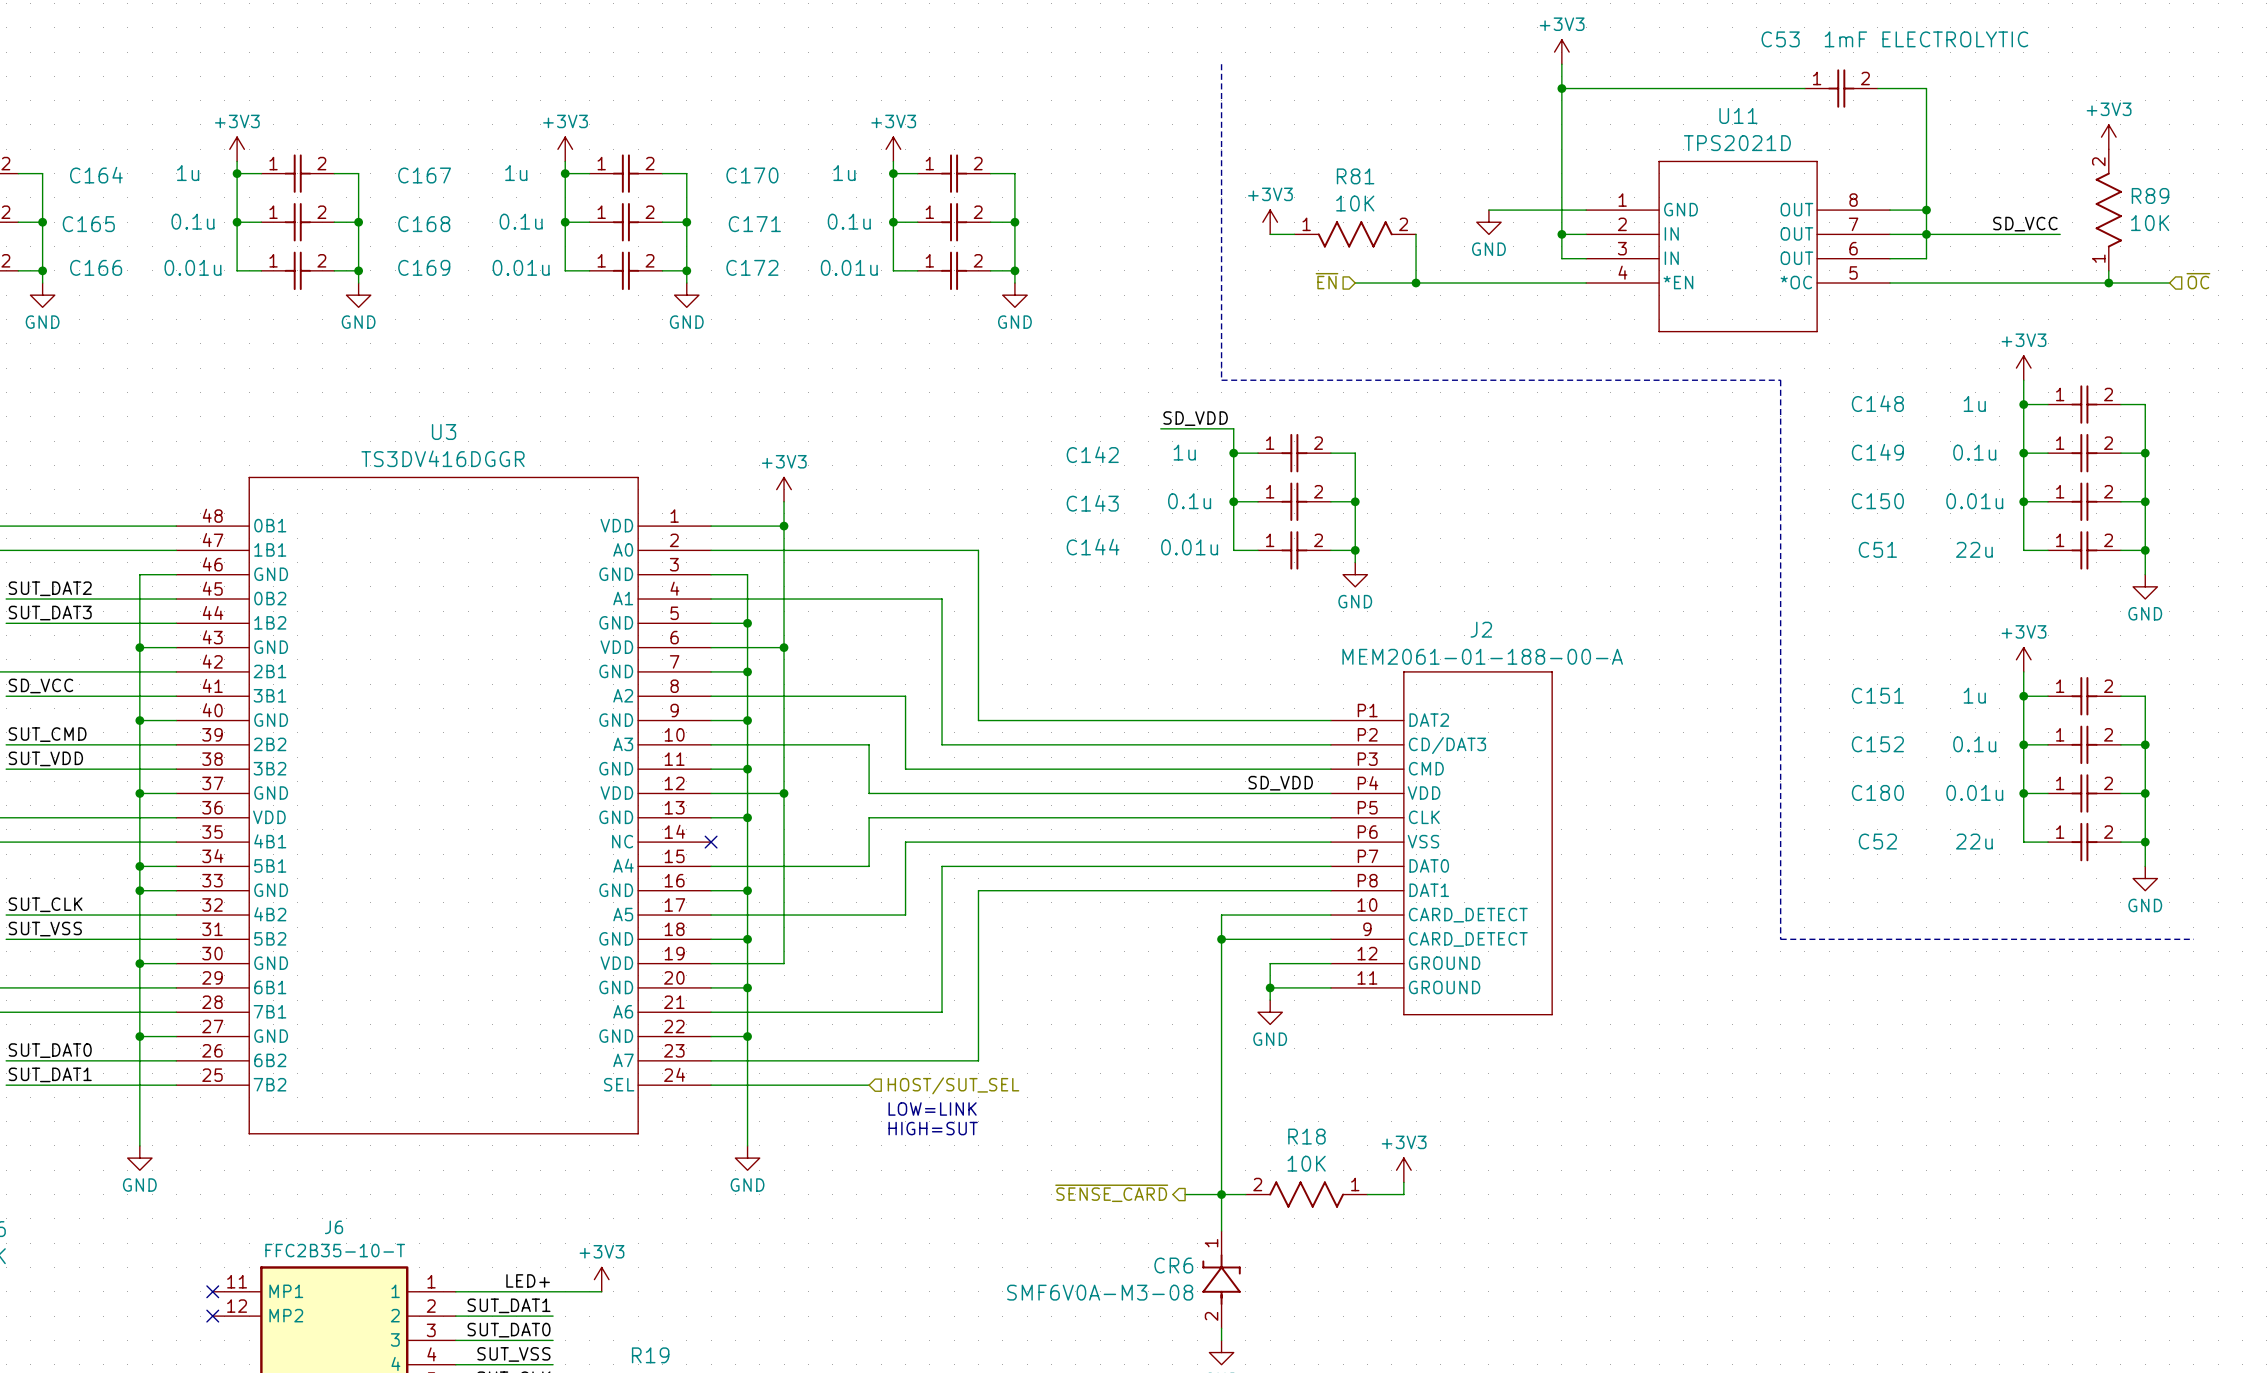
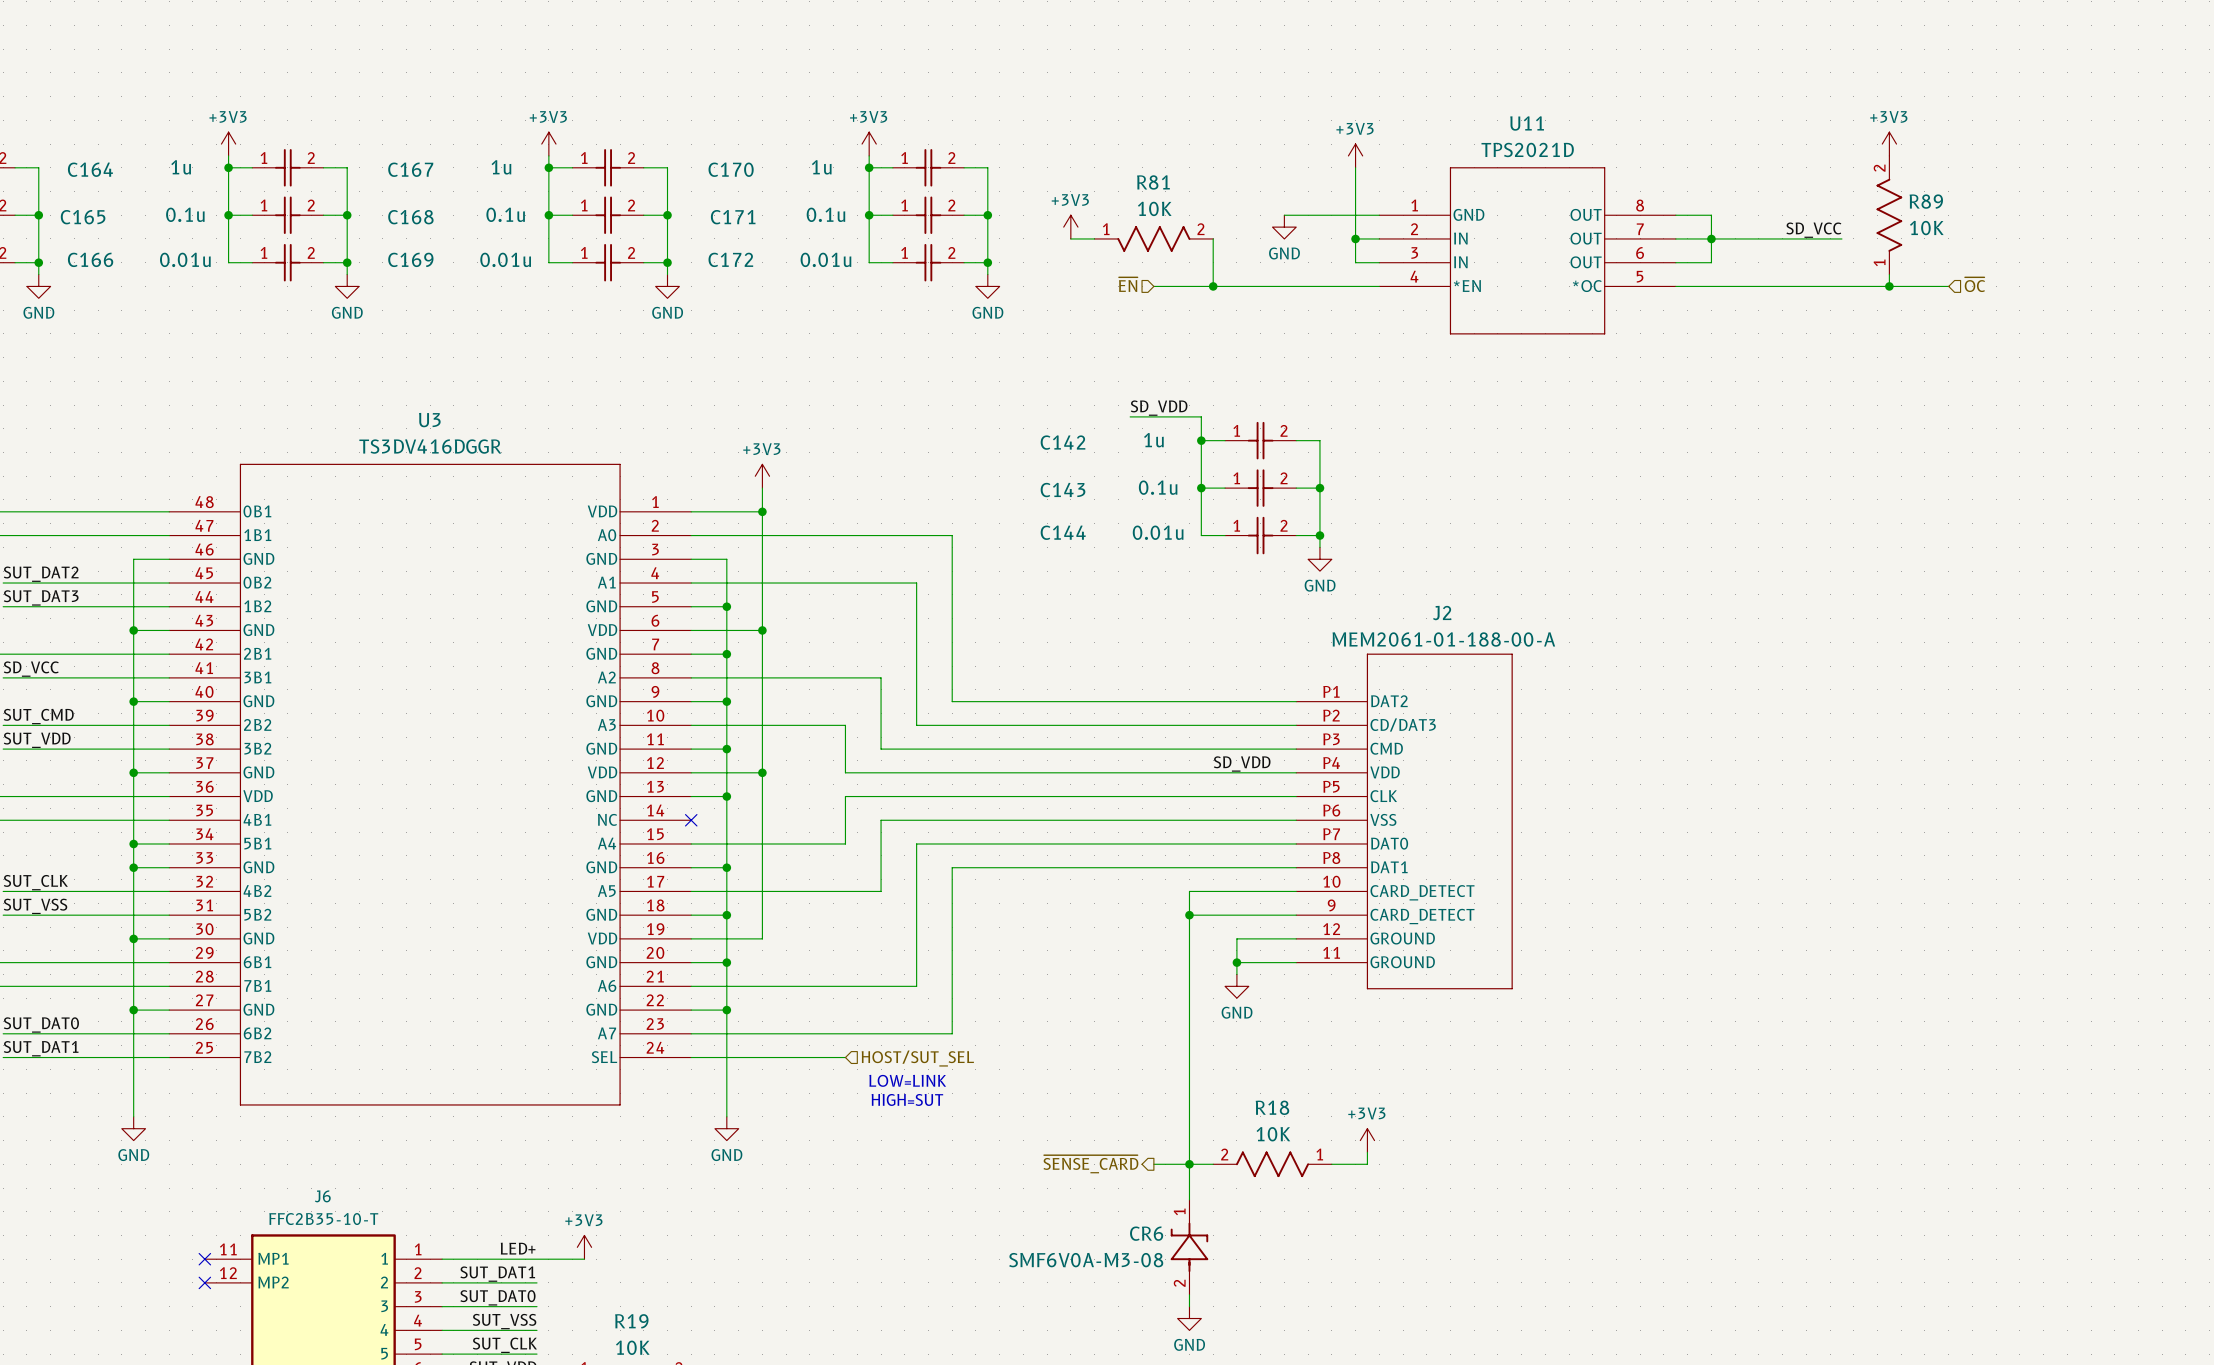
power symbol: +3V3 (1561, 52) -> none
line: (1221, 64) (1221, 380) (1780, 380) (1780, 939) (2193, 939) -> none
wire: (1561, 64) (1561, 258) (1586, 258) -> none
wire: (1561, 88) (1804, 88) -> none
junction: (1561, 88) -> none
C53: 1mF ELECTROLYTIC (1841, 88) -> none
wire: (1877, 88) (1926, 88) (1926, 258) (1890, 258) -> none
power symbol: +3V3 (2108, 137) -> none
power symbol: none -> +3V3 (1889, 144)
power symbol: none -> +3V3 (1355, 155)
wire: none -> (1355, 167) (1355, 262) (1379, 262)
wire: (1488, 210) (1586, 210) -> (1284, 215) (1379, 215)
wire: (1890, 210) (1926, 210) -> none
junction: (1926, 210) -> none
R89 position: (2108, 210) -> (1889, 215)
power symbol: +3V3 (1270, 222) -> none
power symbol position: GND (1488, 222) -> GND (1284, 227)
wire: none -> (1675, 215) (1711, 215) (1711, 262) (1675, 262)
label position: SD_VCC (2025, 224) -> SD_VCC (1813, 230)
power symbol: none -> +3V3 (1070, 227)
wire: (1270, 234) (1294, 234) -> (1070, 238) (1094, 238)
R81 position: (1355, 234) -> (1153, 238)
wire: (1416, 234) (1416, 283) -> (1213, 238) (1213, 286)
wire: (1561, 234) (1586, 234) -> (1355, 238) (1379, 238)
junction: (1561, 234) -> none
wire: (1890, 234) (2060, 234) -> (1675, 238) (1841, 238)
junction: (1926, 234) -> none
U11 position: (1738, 246) -> (1527, 250)
junction: none -> (1711, 238)
wire: (2108, 270) (2108, 283) -> (1889, 274) (1889, 286)
hierarchical label position: ~{EN} (1326, 281) -> ~{EN} (1128, 284)
hierarchical label position: ~{OC} (2198, 281) -> ~{OC} (1974, 284)
wire: (1355, 283) (1586, 283) -> (1153, 286) (1379, 286)
junction position: (1416, 283) -> (1355, 238)
wire: (1890, 283) (2169, 283) -> (1675, 286) (1948, 286)
junction: (2108, 283) -> none
junction: none -> (1213, 286)
junction: none -> (1889, 286)
power symbol: +3V3 (2023, 368) -> none
wire: (2023, 380) (2023, 550) (2048, 550) -> none
wire: (2023, 404) (2048, 404) -> none
junction: (2023, 404) -> none
C148: 1u (2084, 404) -> none
wire: (2120, 404) (2145, 404) (2145, 574) -> none
wire: (2023, 453) (2048, 453) -> none
junction: (2023, 453) -> none
C149: 0.1u (2084, 453) -> none
wire: (2120, 453) (2145, 453) -> none
junction: (2145, 453) -> none
wire: (2023, 501) (2048, 501) -> none
junction: (2023, 501) -> none
C150: 0.01u (2084, 501) -> none
wire: (2120, 501) (2145, 501) -> none
junction: (2145, 501) -> none
C51: 22u (2084, 550) -> none
wire: (2120, 550) (2145, 550) -> none
junction: (2145, 550) -> none
power symbol: GND (2145, 586) -> none
power symbol: +3V3 (2023, 659) -> none
wire: (2023, 671) (2023, 842) (2048, 842) -> none
wire: (2023, 696) (2048, 696) -> none
junction: (2023, 696) -> none
C151: 1u (2084, 696) -> none
wire: (2120, 696) (2145, 696) (2145, 866) -> none
wire: (2023, 744) (2048, 744) -> none
junction: (2023, 744) -> none
C152: 0.1u (2084, 744) -> none
wire: (2120, 744) (2145, 744) -> none
junction: (2145, 744) -> none
wire: (2023, 793) (2048, 793) -> none
junction: (2023, 793) -> none
C180: 0.01u (2084, 793) -> none
wire: (2120, 793) (2145, 793) -> none
junction: (2145, 793) -> none
C52: 22u (2084, 842) -> none
wire: (2120, 842) (2145, 842) -> none
junction: (2145, 842) -> none
power symbol: GND (2145, 878) -> none

